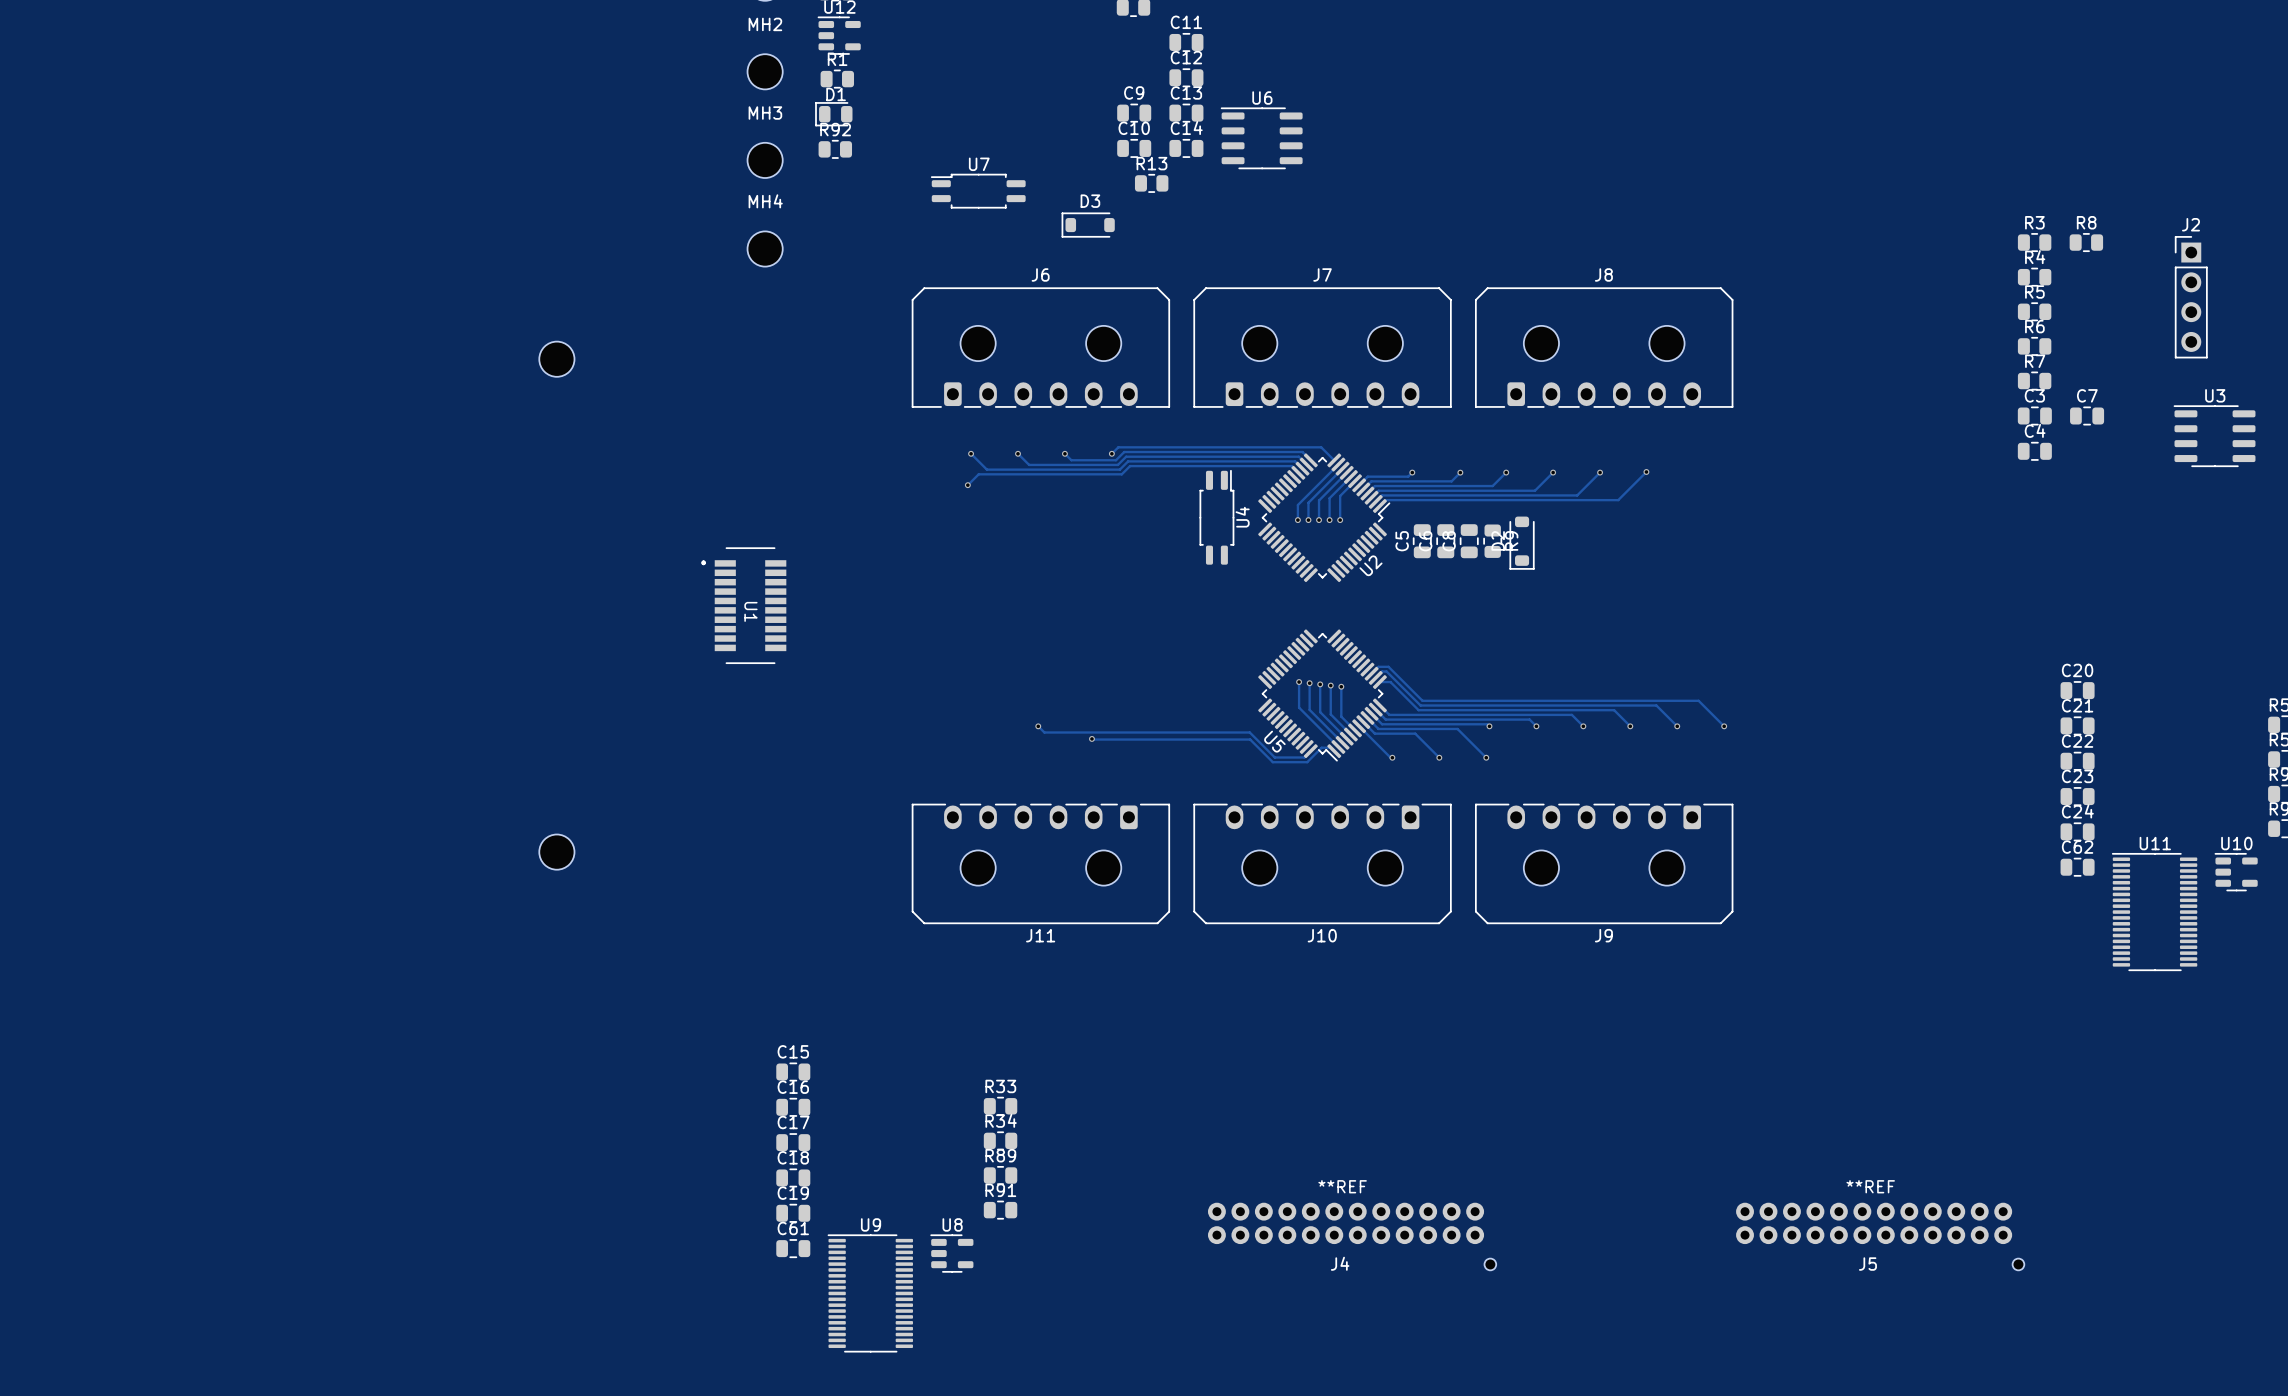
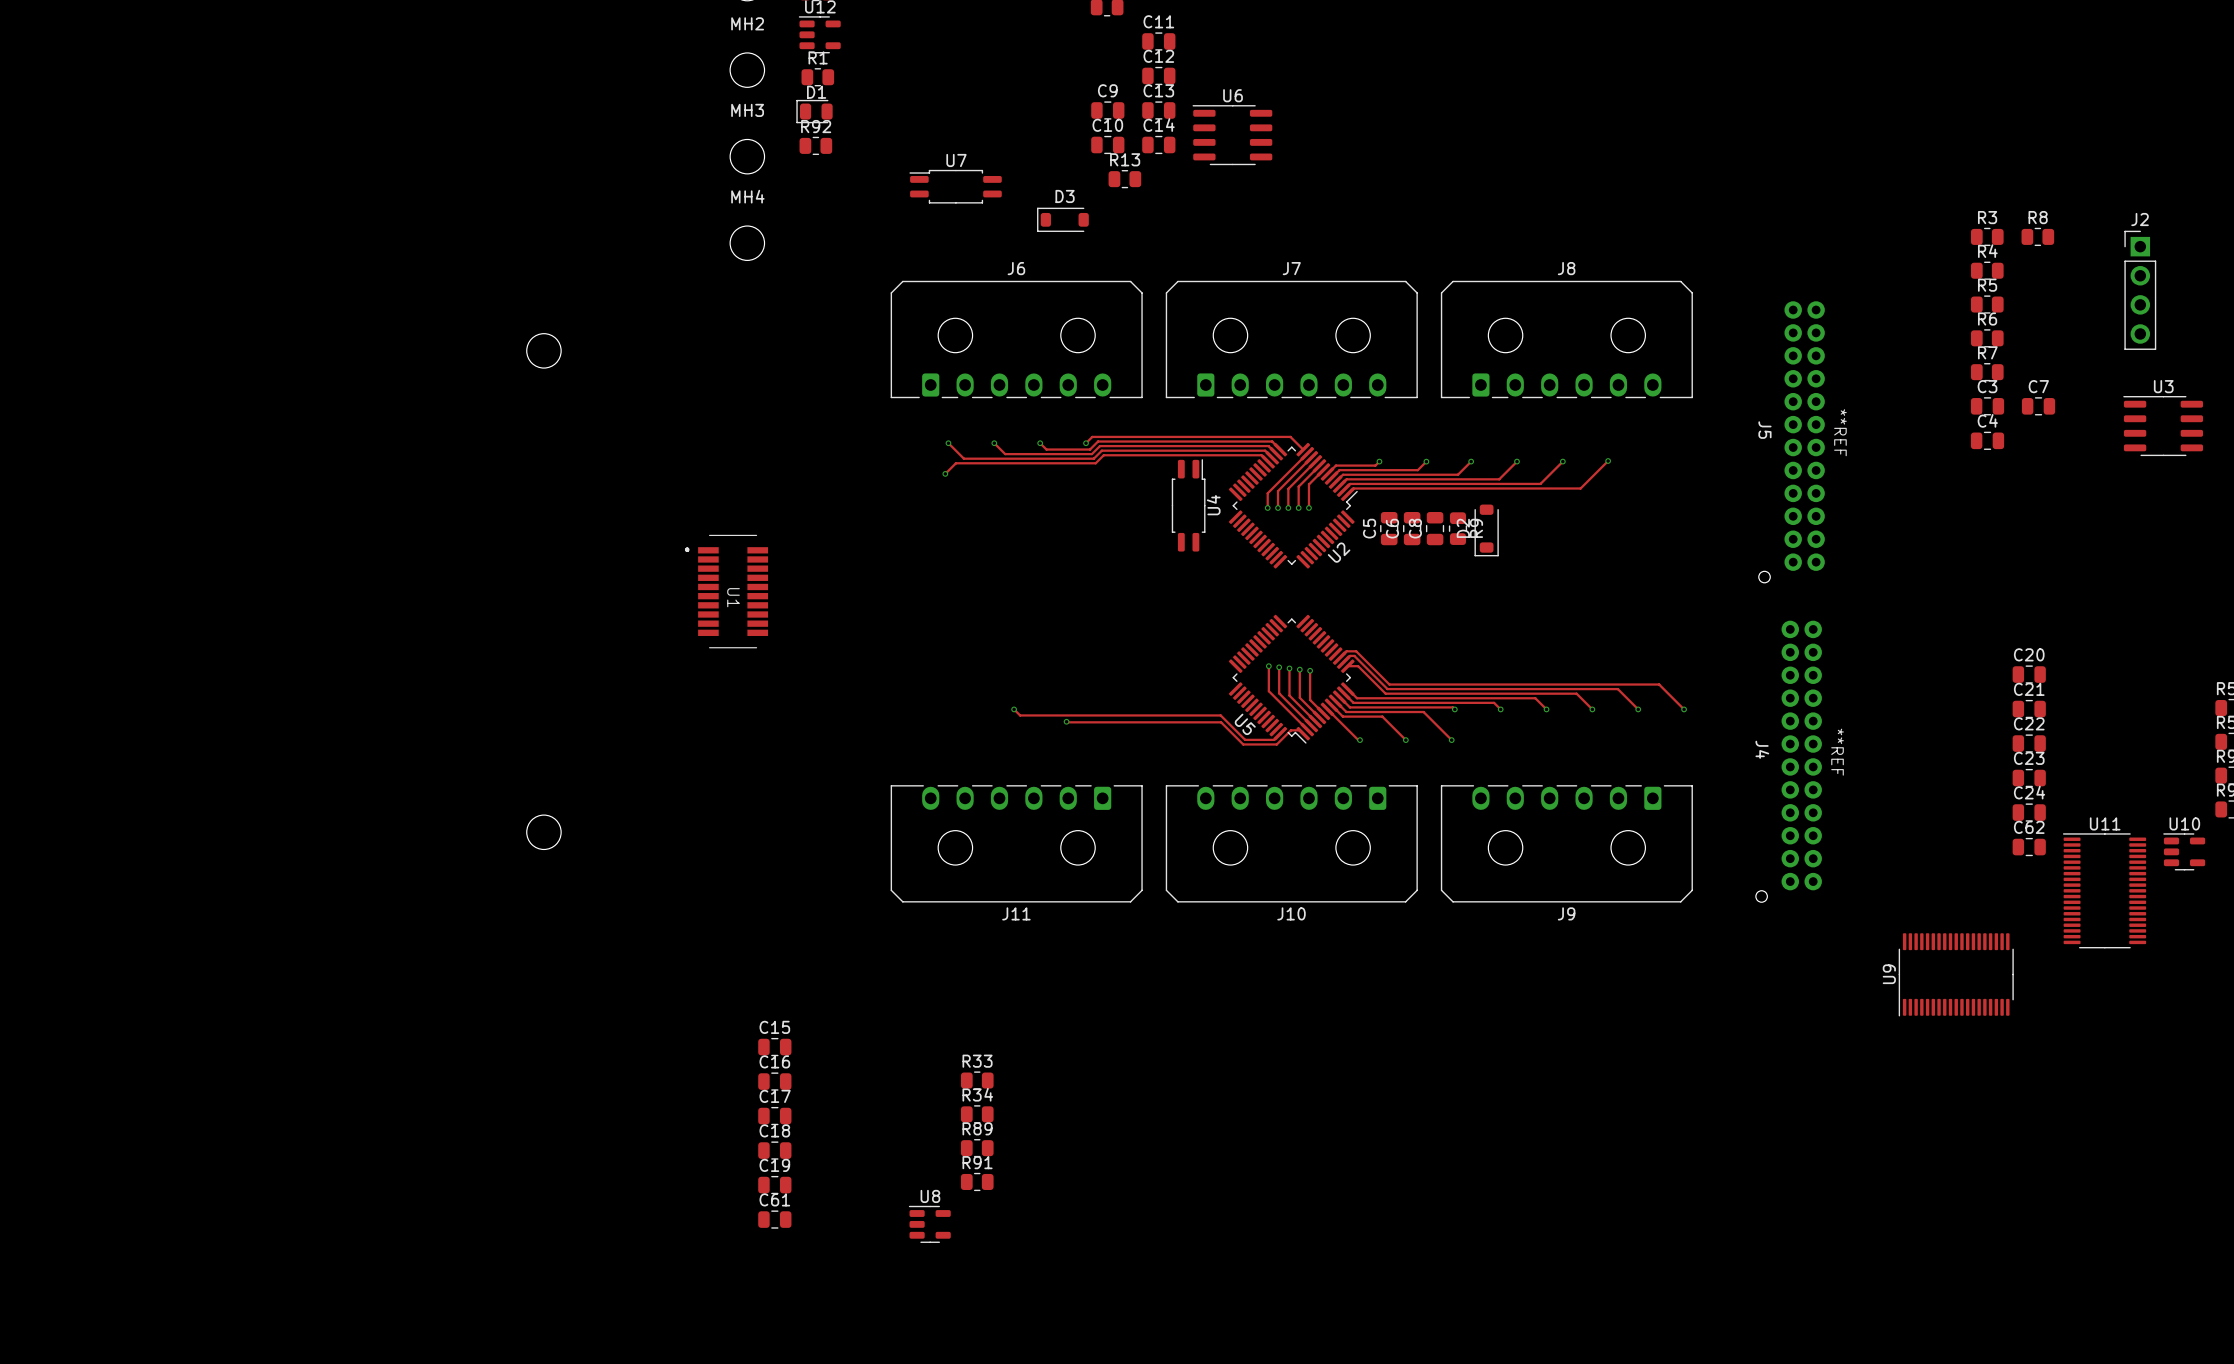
J4 rotation: 0° (1352, 1236) -> 90° clockwise (1788, 761)
J4 position: (1352, 1236) -> (1788, 761)
J5 rotation: 0° (1880, 1236) -> 90° clockwise (1791, 442)
J5 position: (1880, 1236) -> (1791, 442)
U9 rotation: 0° (870, 1293) -> 90° counterclockwise (1956, 974)
U9 position: (870, 1293) -> (1956, 974)

